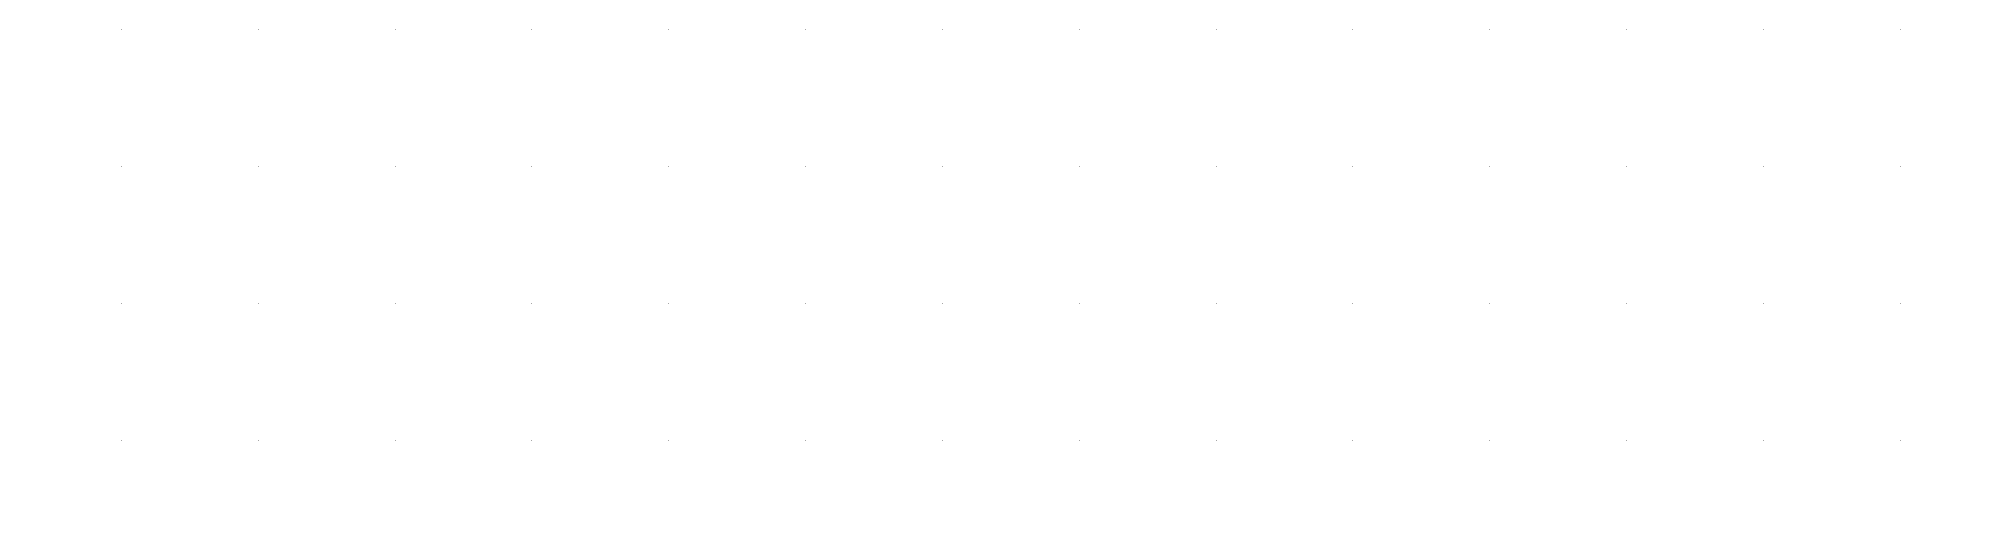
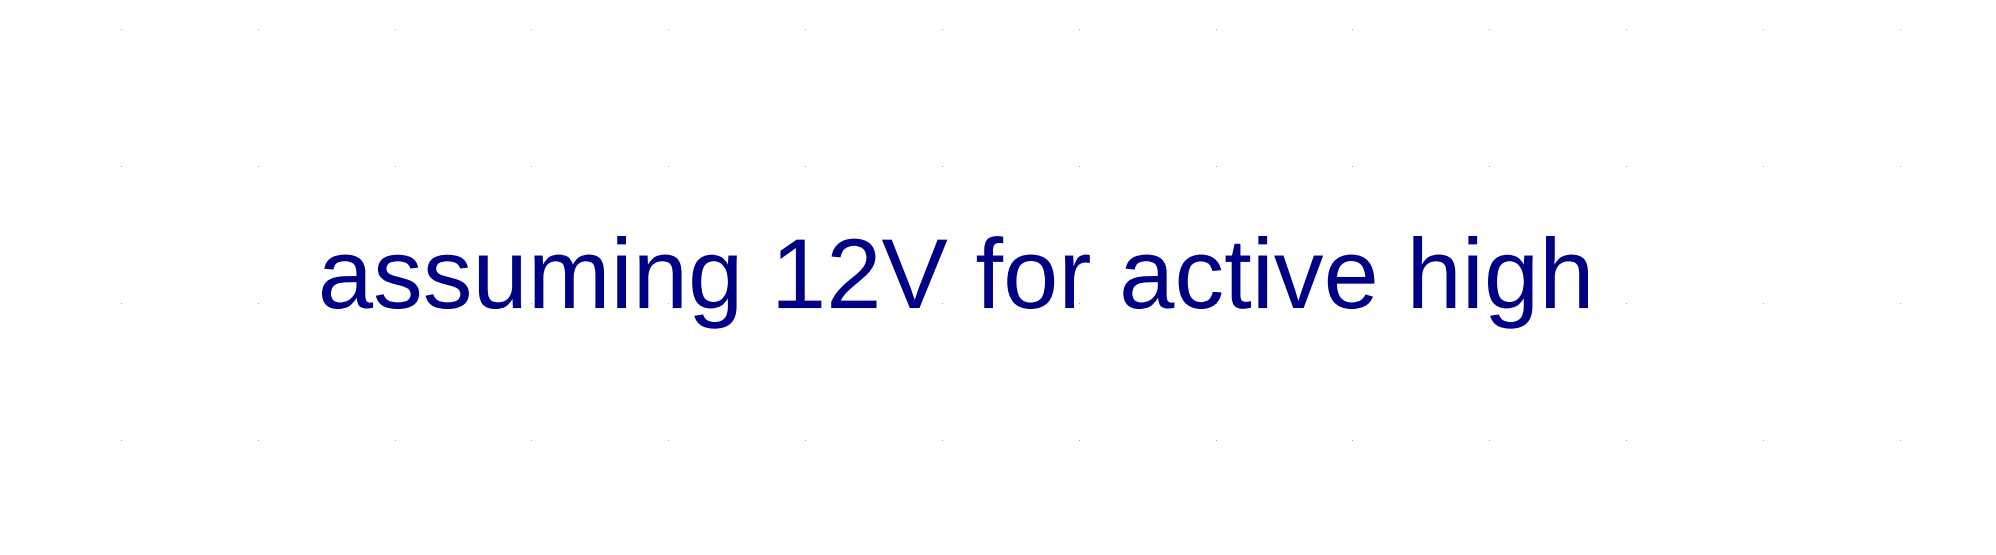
text: none -> assuming 12V for active high (954, 282)

